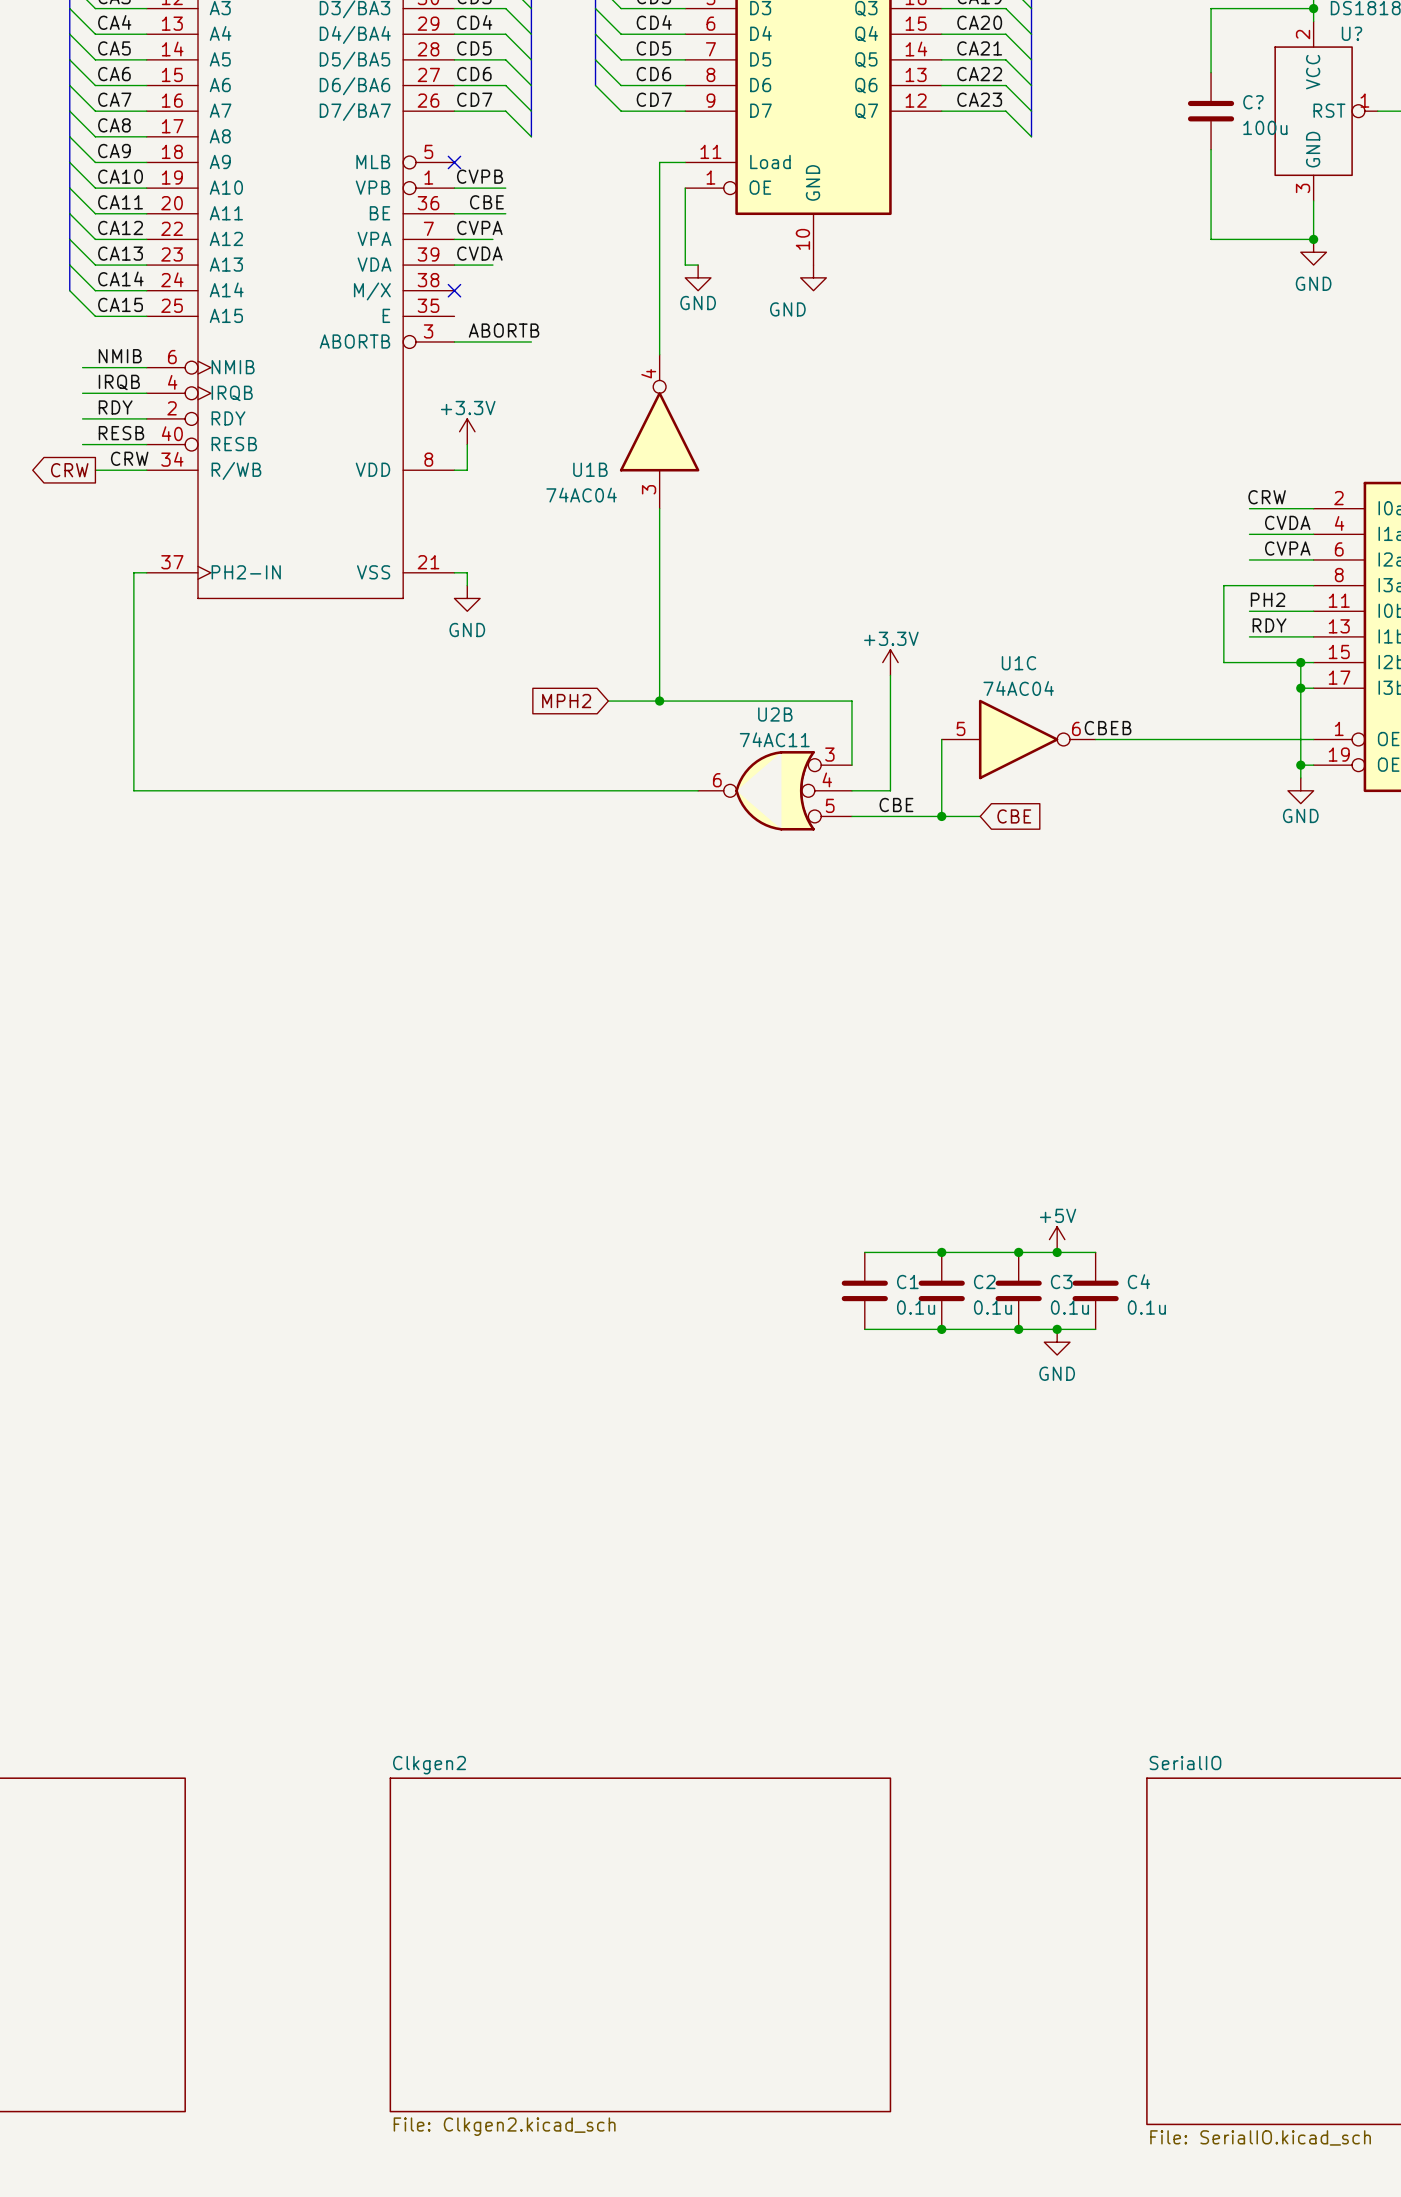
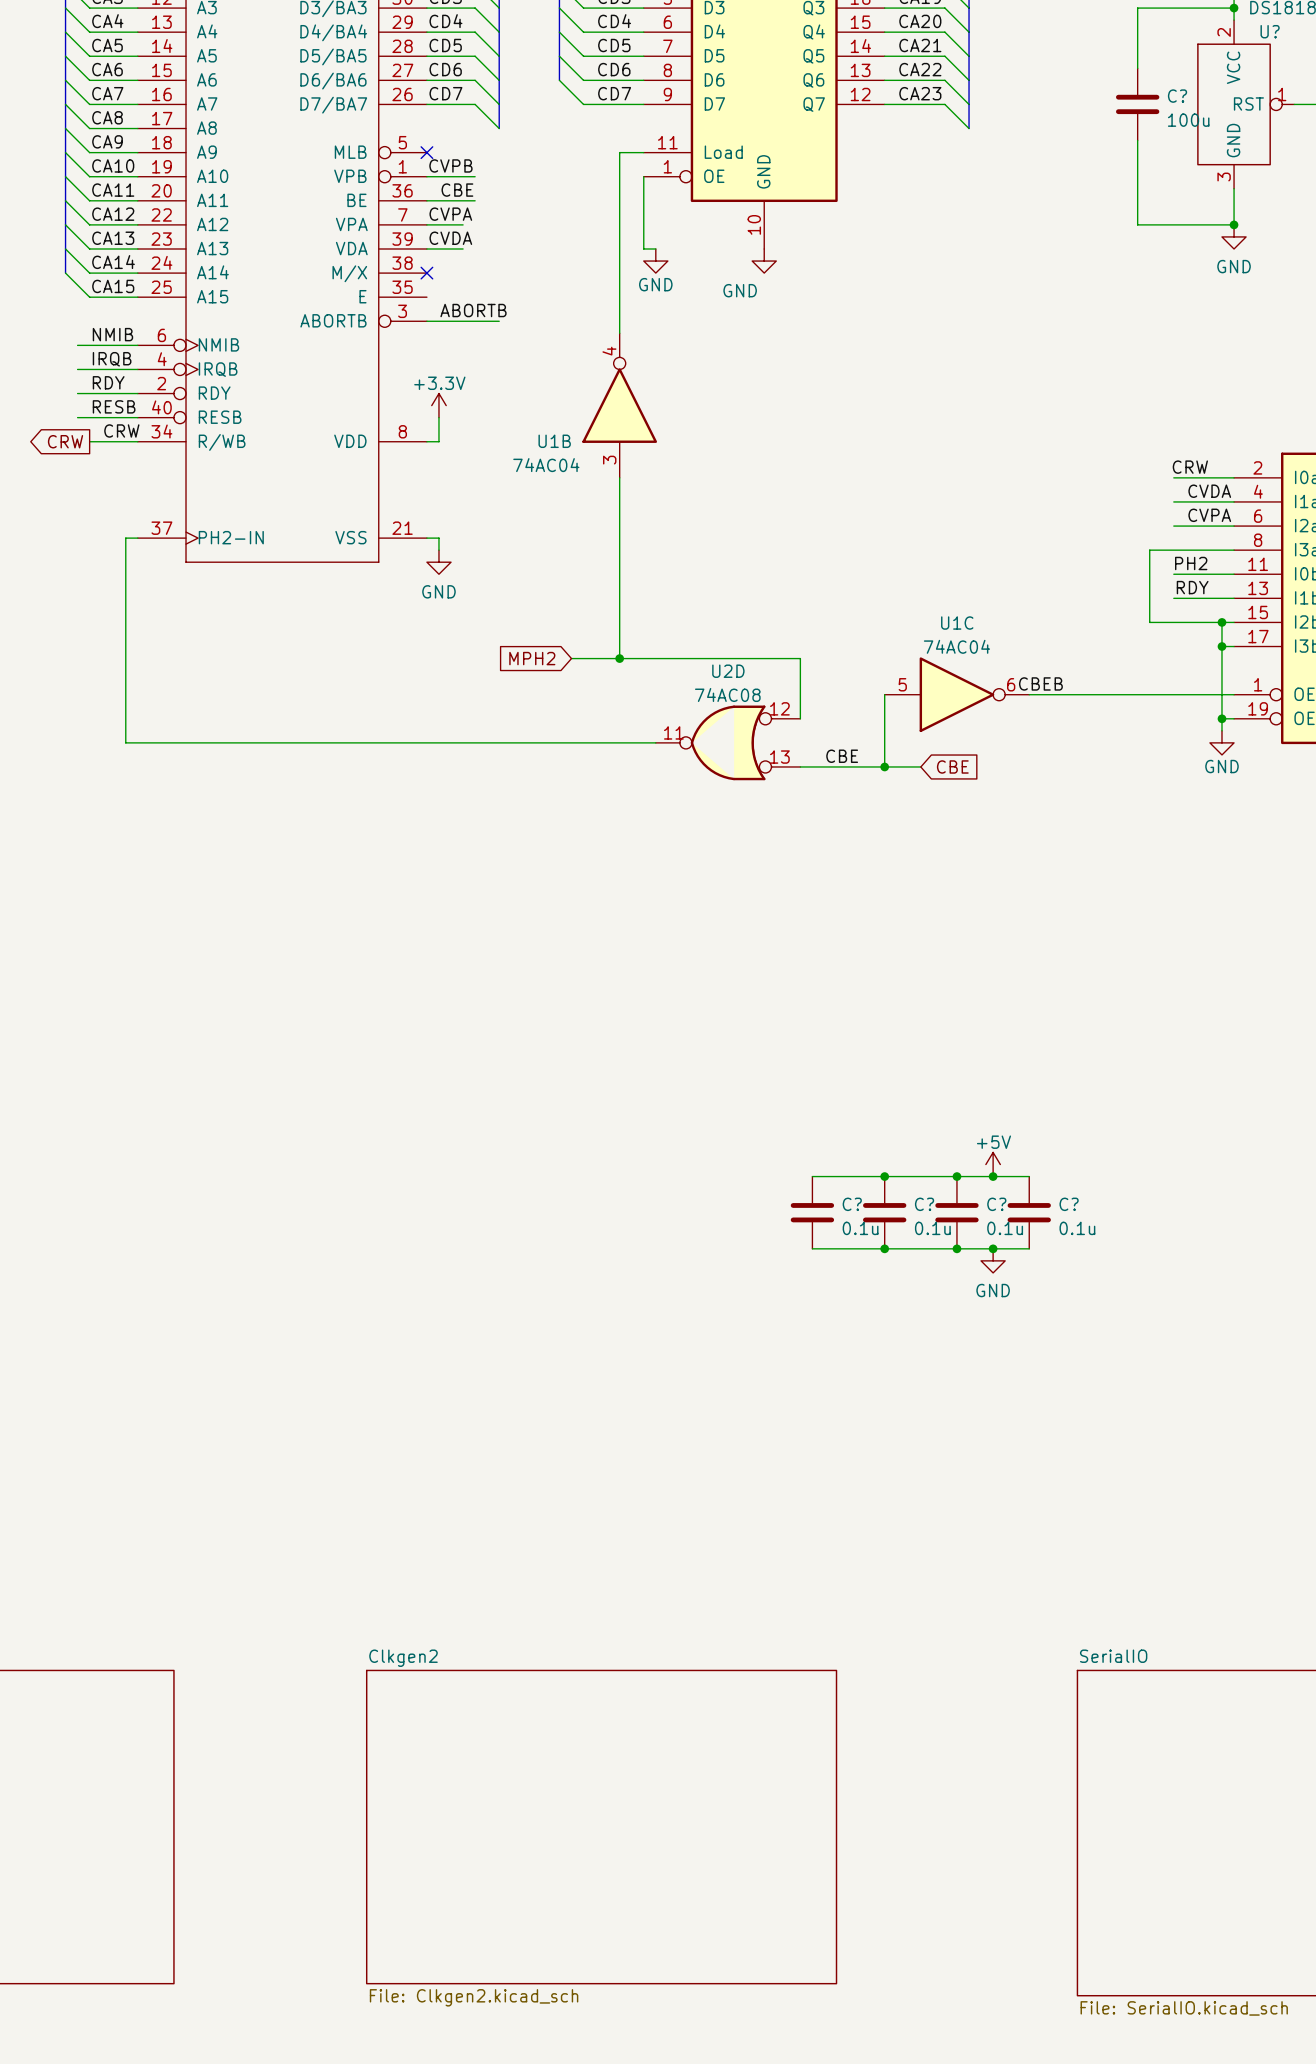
power symbol: +3.3V (890, 662) -> none
wire: (890, 675) (890, 790) (851, 790) -> none
U2B: 74AC11 (775, 790) -> none
U2D: none -> 74AC08 (728, 742)
C4 name: C4 (1138, 1281) -> C? (1069, 1204)
C1 name: C1 (907, 1282) -> C? (852, 1204)
C2 name: C2 (984, 1282) -> C? (924, 1204)
C3 name: C3 (1061, 1282) -> C? (996, 1204)

